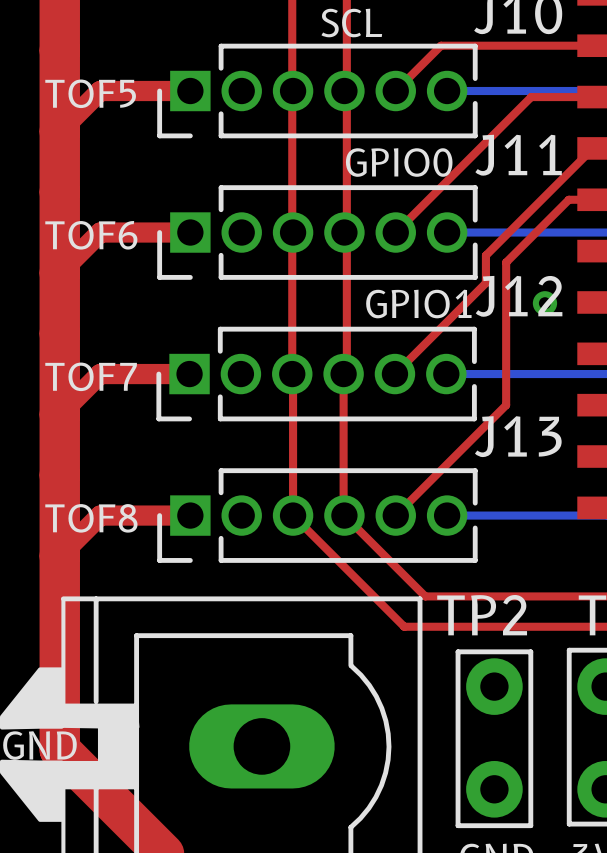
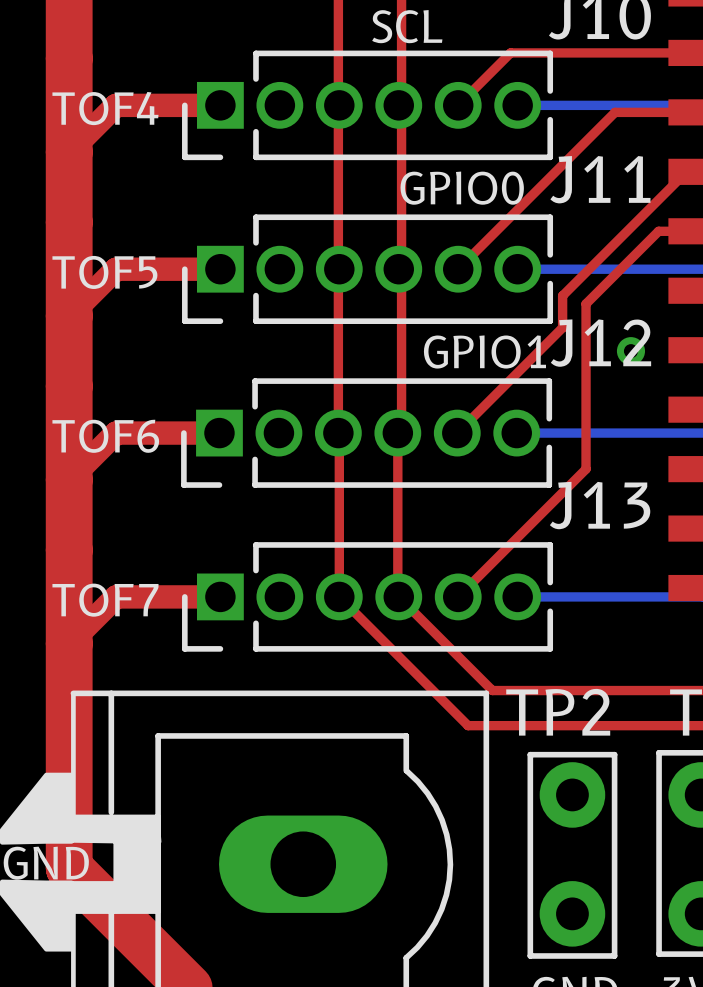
text: TOF5 (90, 93) -> TOF4 (105, 108)
text: TOF6 (91, 235) -> TOF5 (104, 272)
text: TOF7 (91, 376) -> TOF6 (105, 436)
text: TOF8 (91, 518) -> TOF7 (105, 600)

